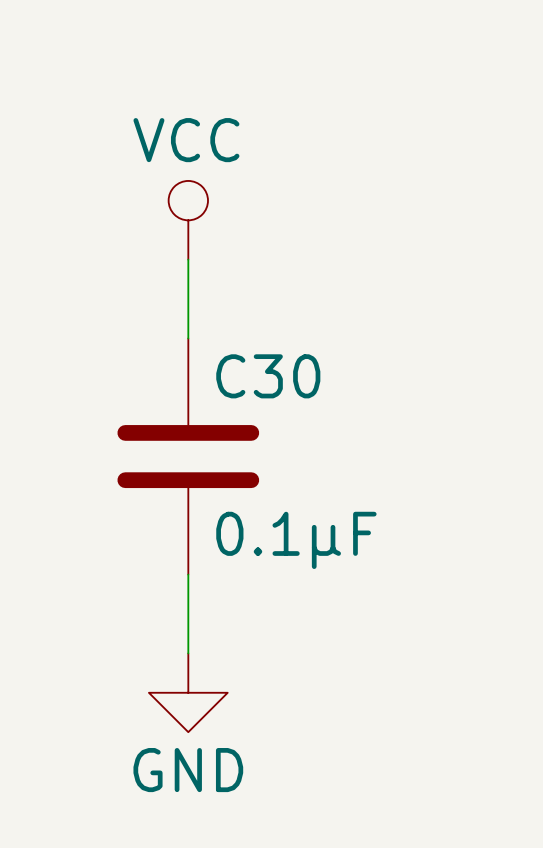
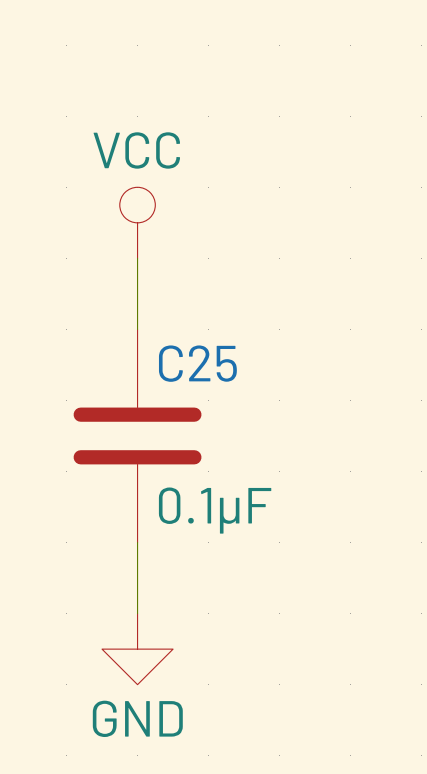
C30 name: C30 (268, 376) -> C25 (197, 363)

